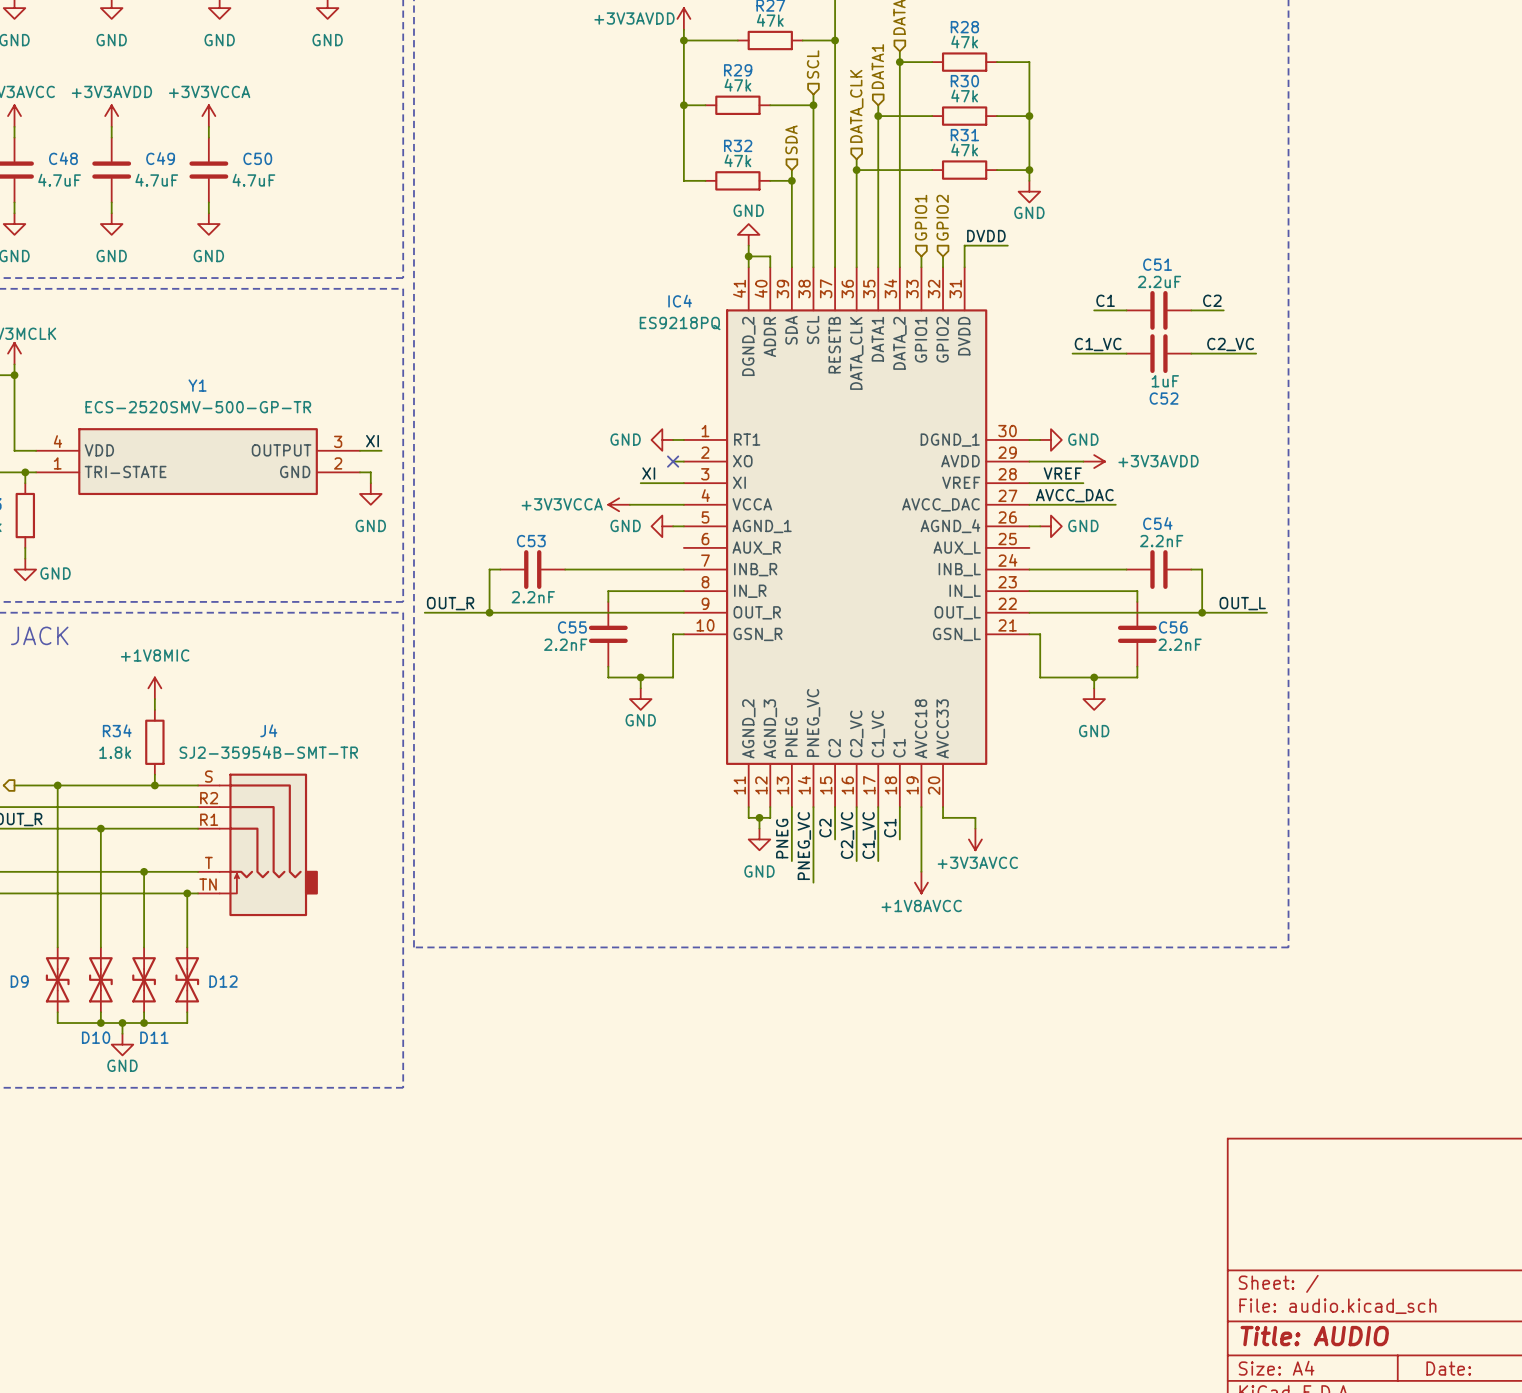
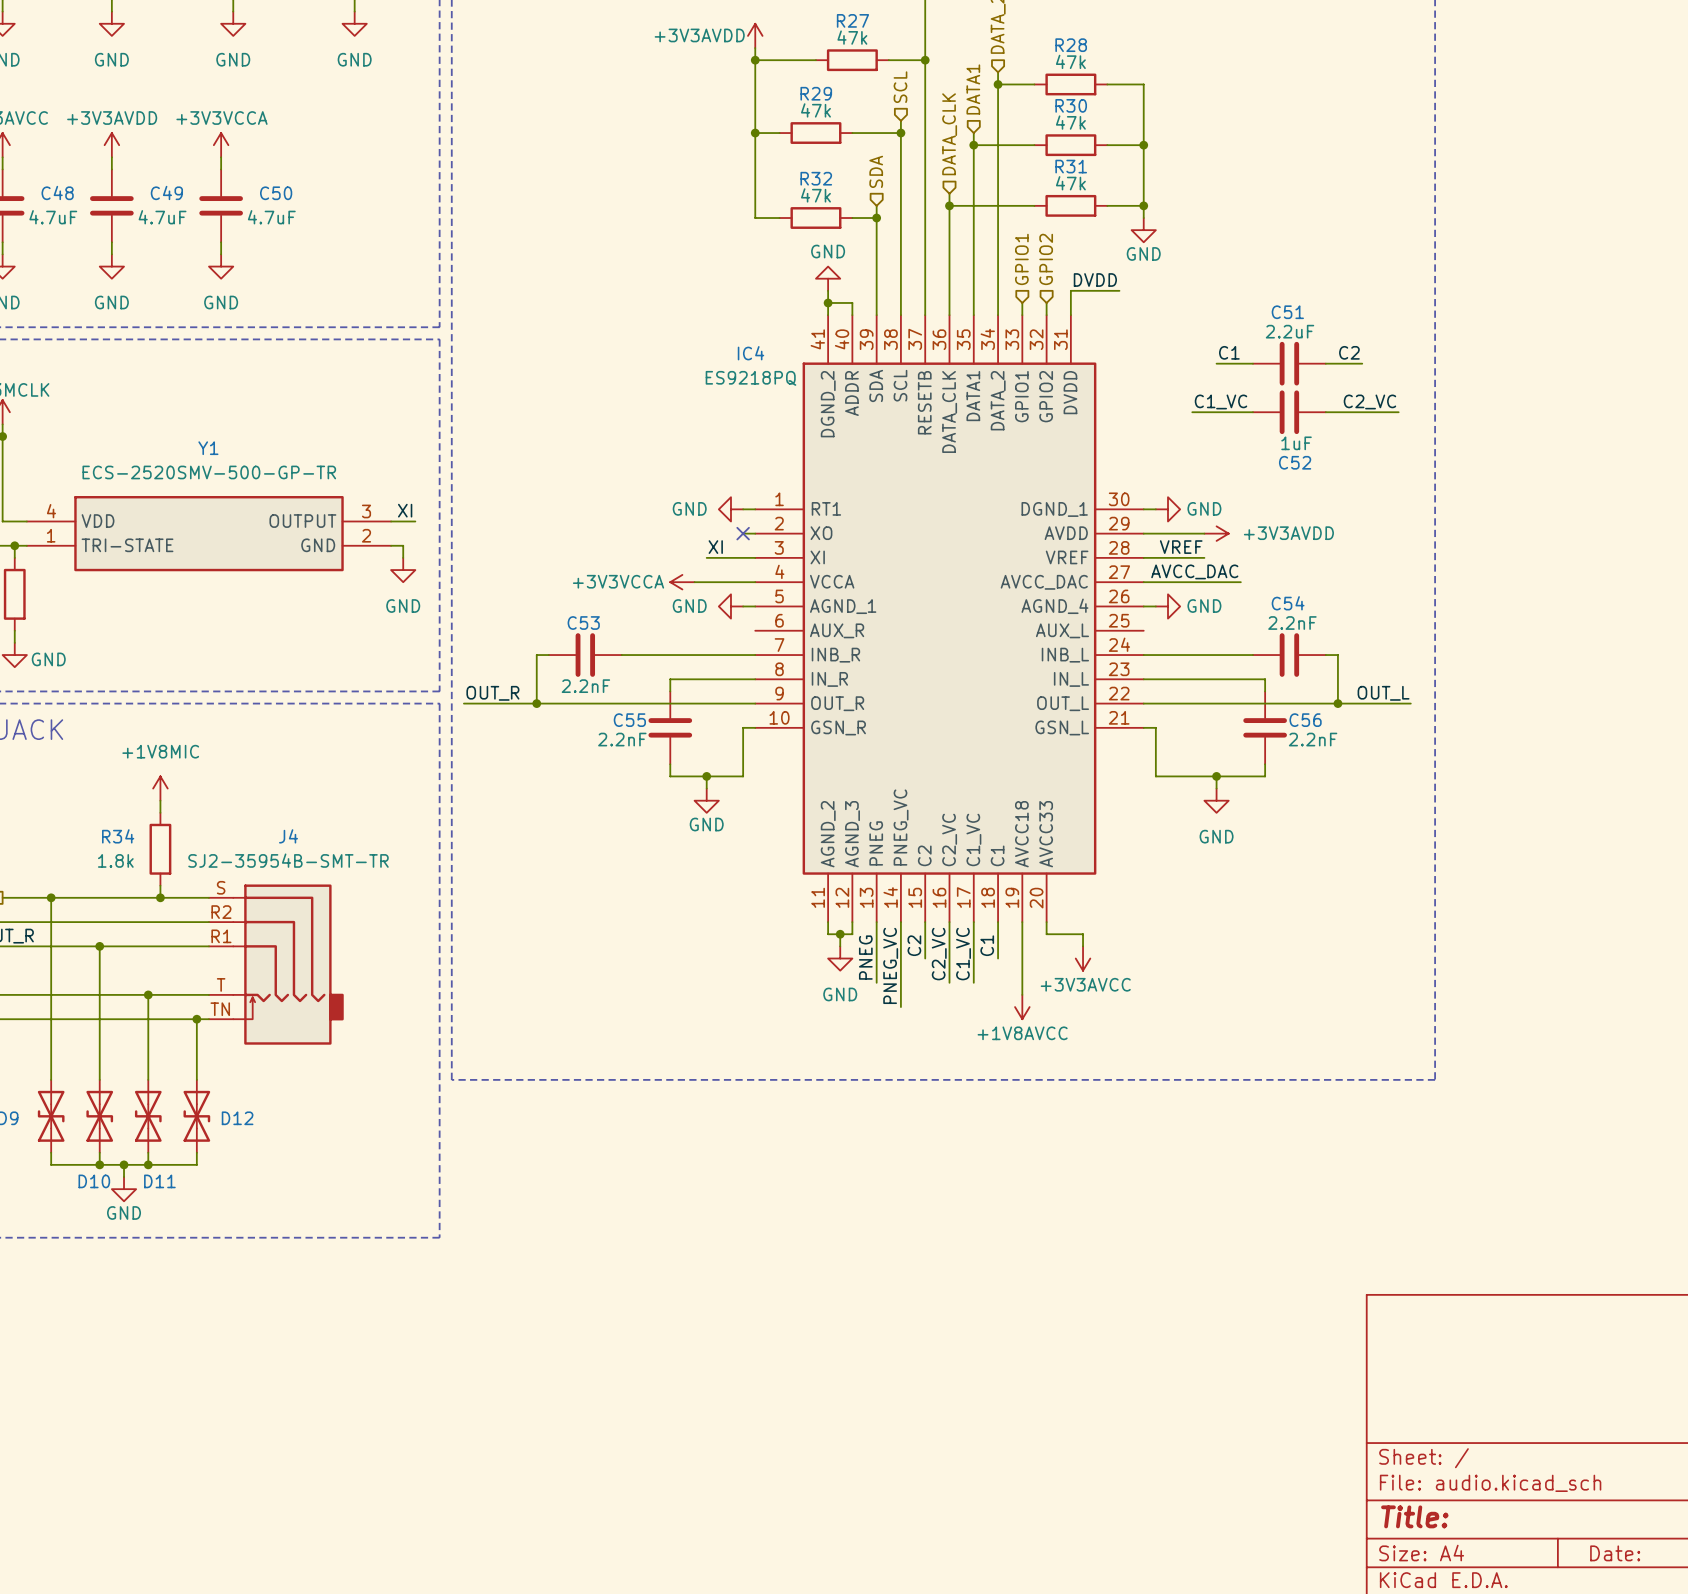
title block: Title: AUDIO (1314, 1336) -> Title: (1414, 1516)

